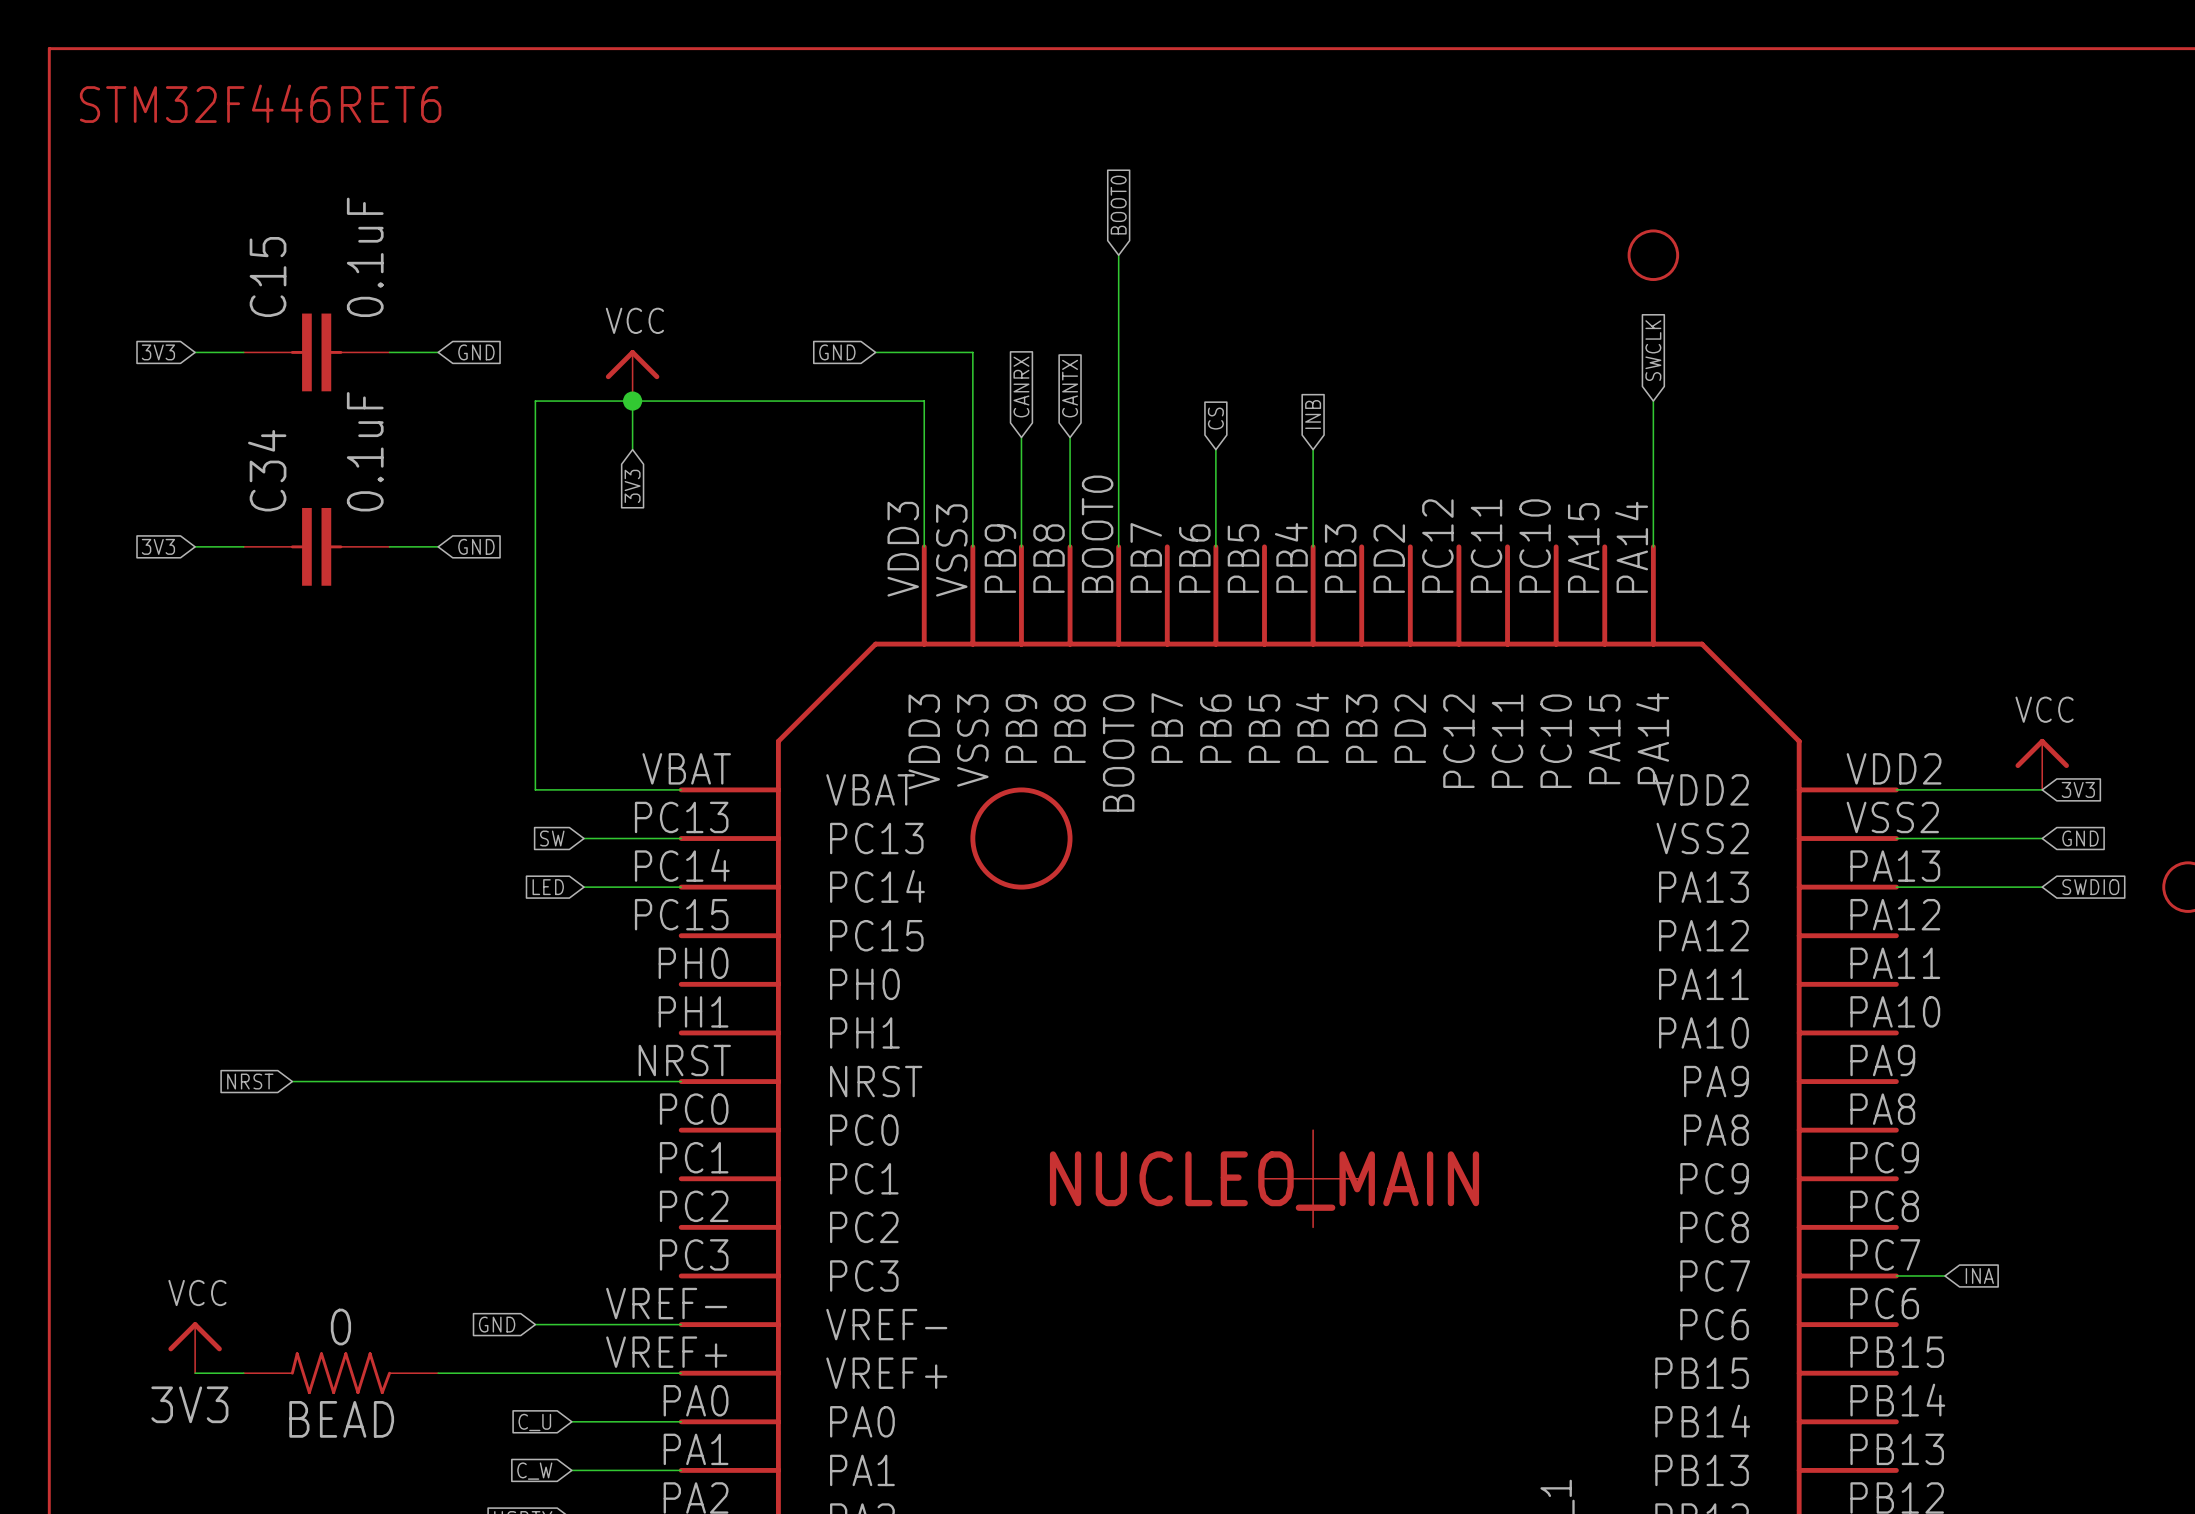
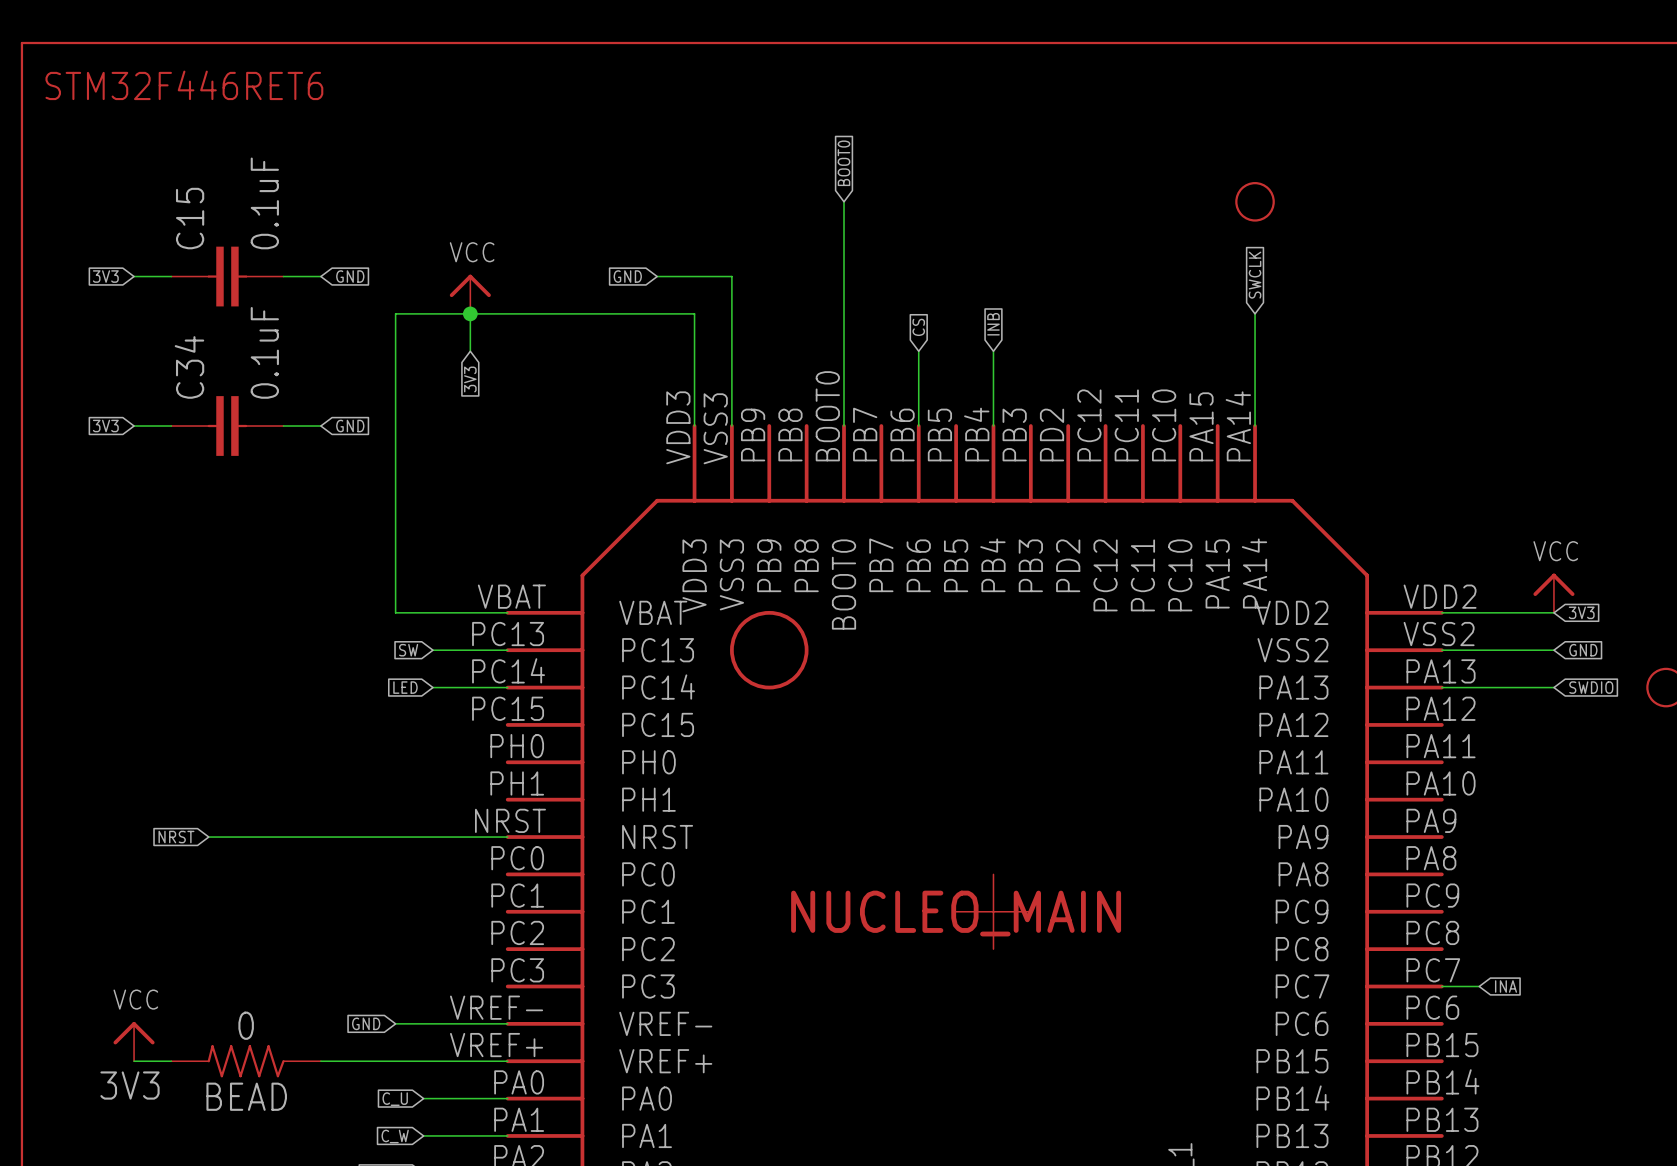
global label: CANRX (1021, 387) -> none
global label: CANTX (1070, 388) -> none
wire: (1021, 437) (1021, 546) -> none
wire: (1070, 437) (1070, 546) -> none

